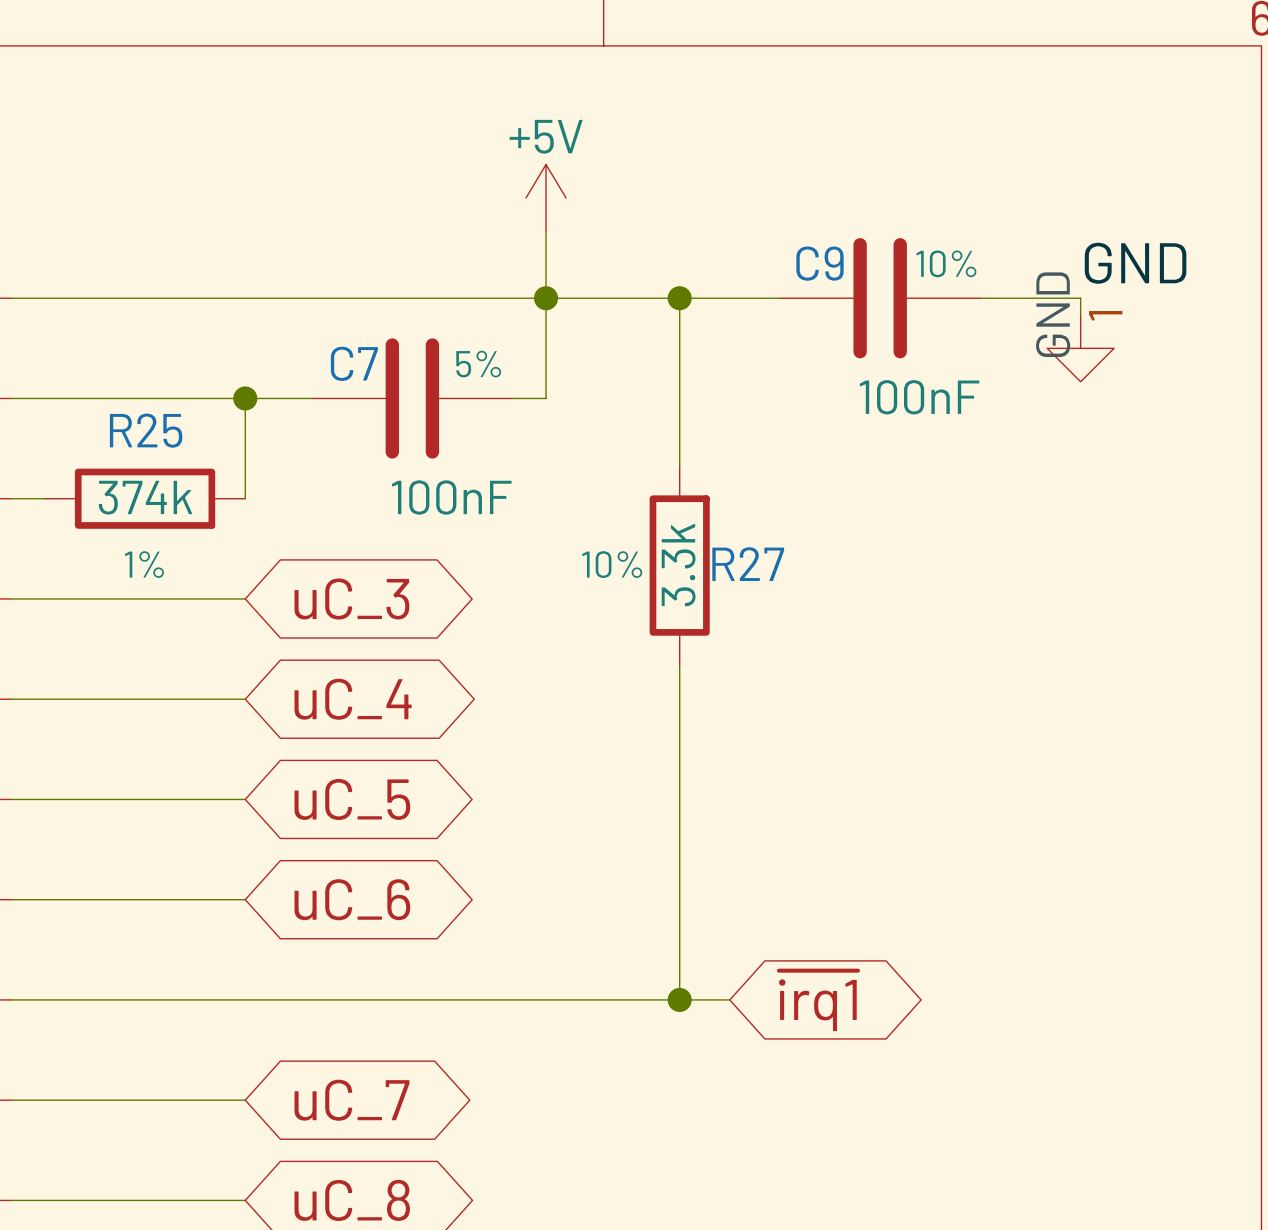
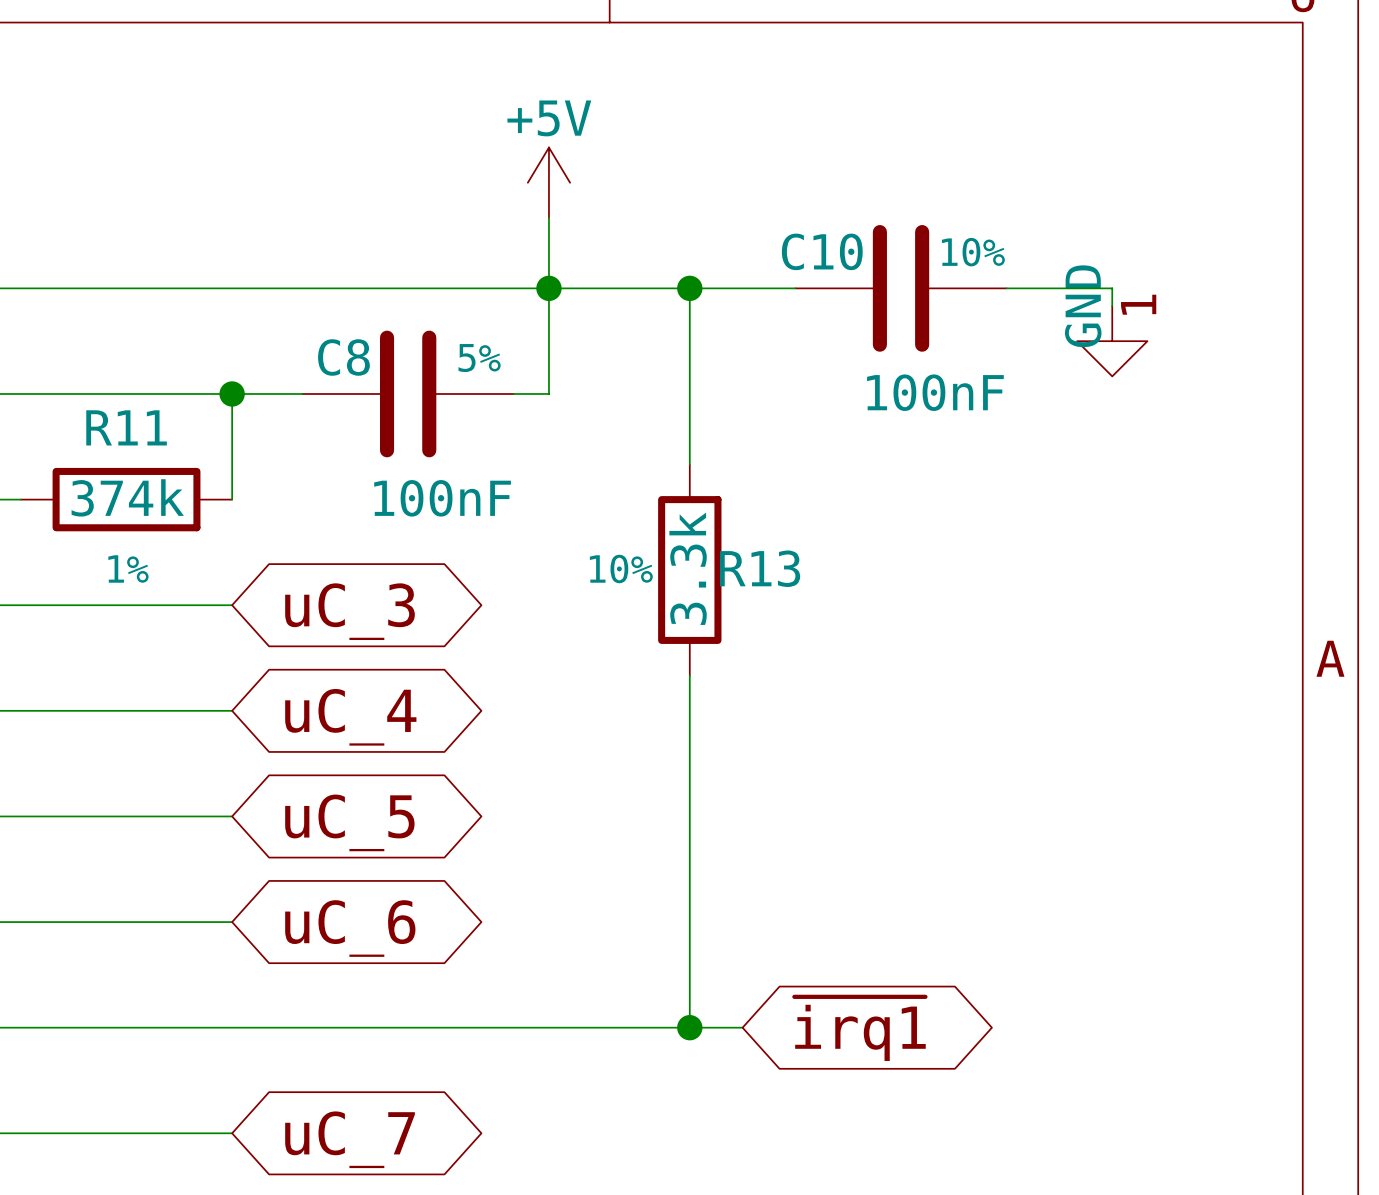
C9 name: C9 (820, 263) -> C10 (822, 251)
label: GND (1135, 263) -> none
C7 name: C7 (354, 363) -> C8 (343, 357)
R25 name: R25 (146, 430) -> R11 (126, 427)
R27 name: R27 (748, 564) -> R13 (760, 568)

